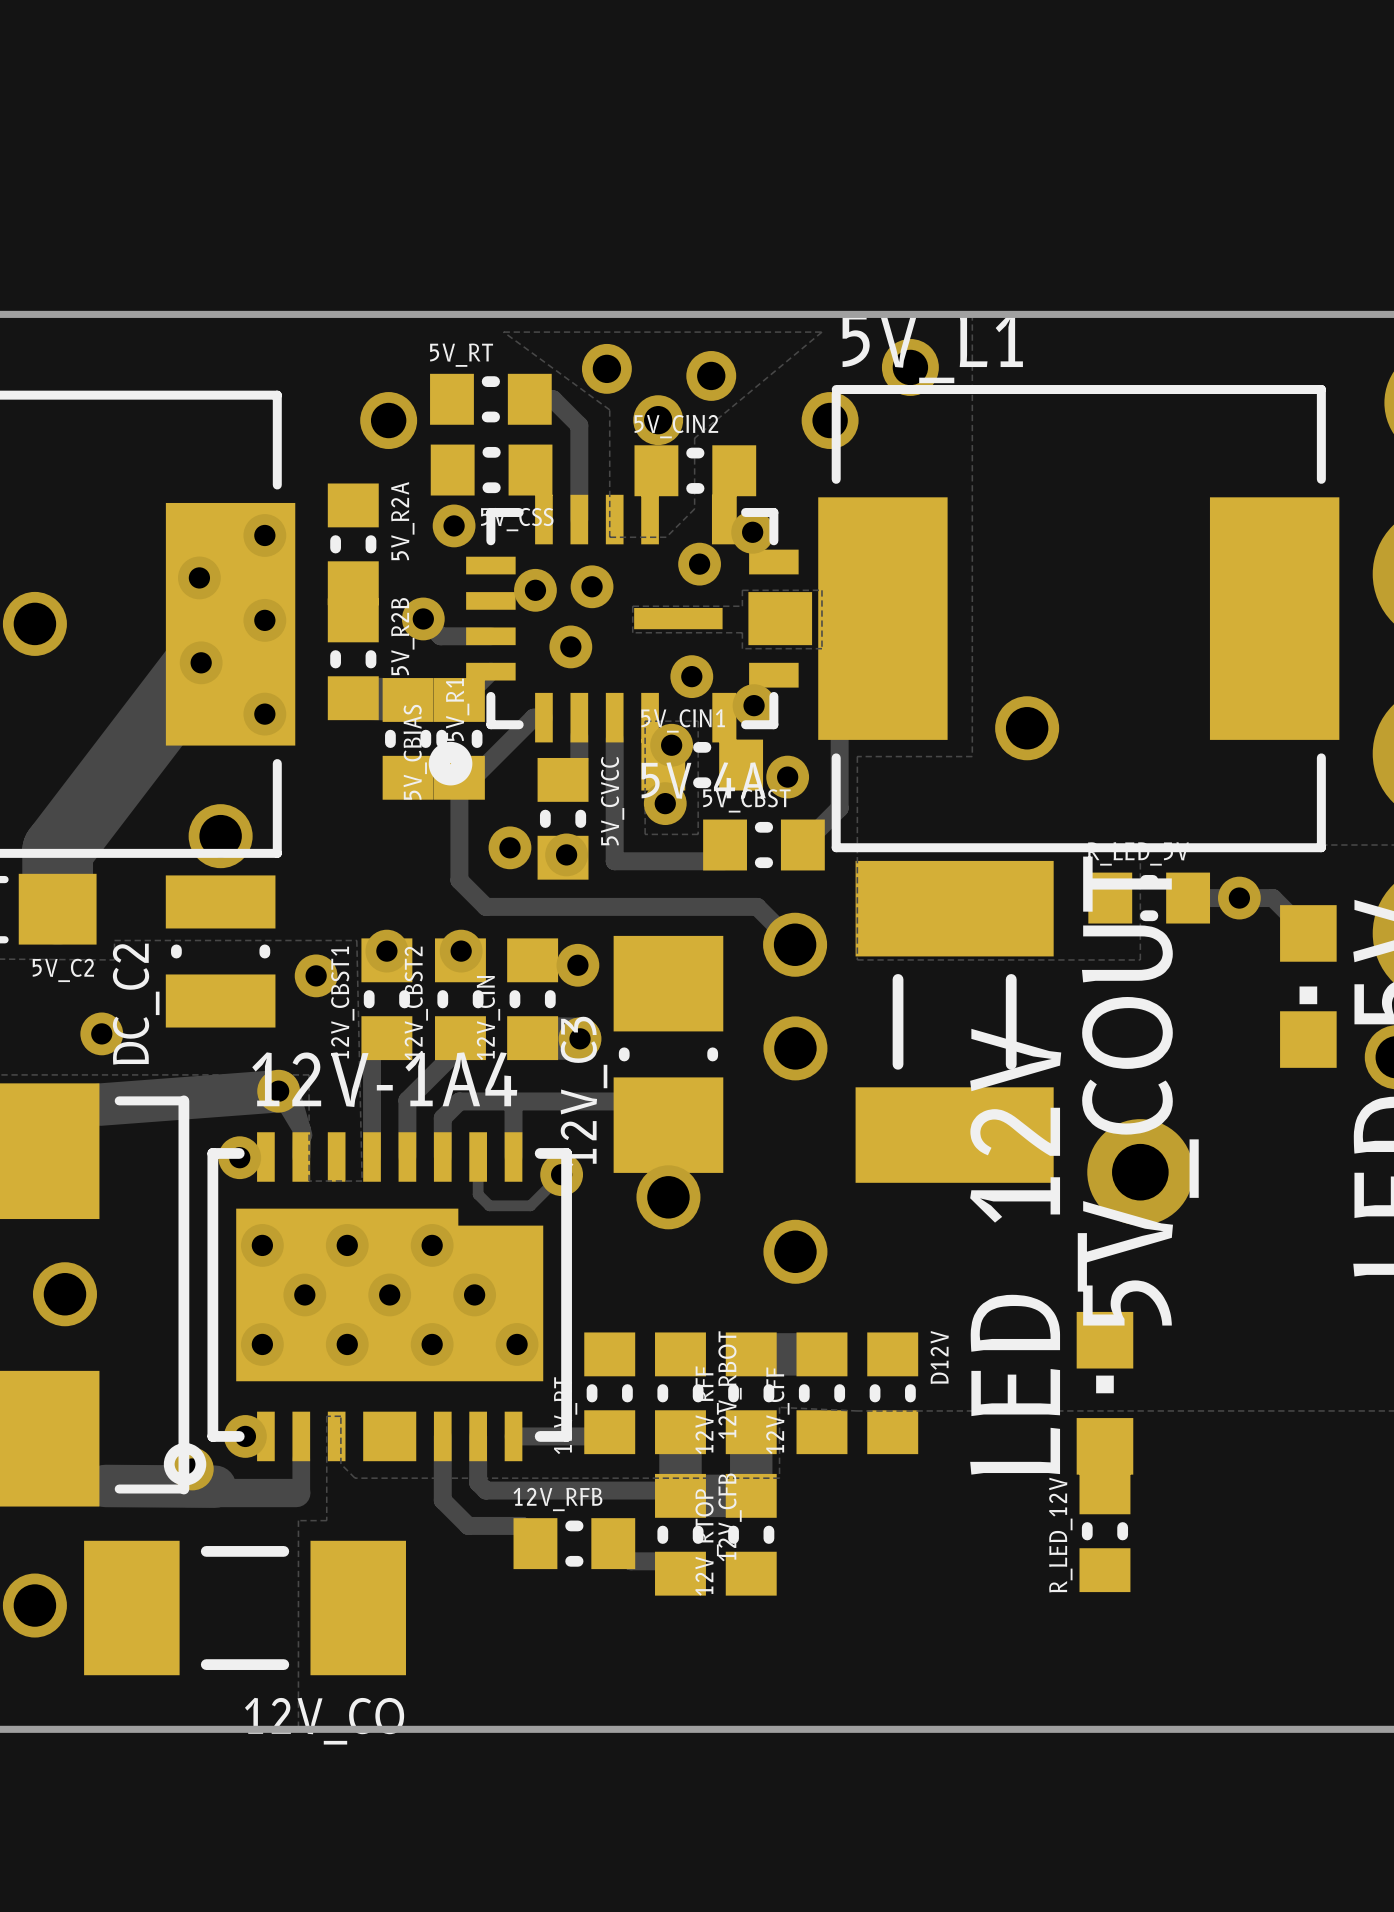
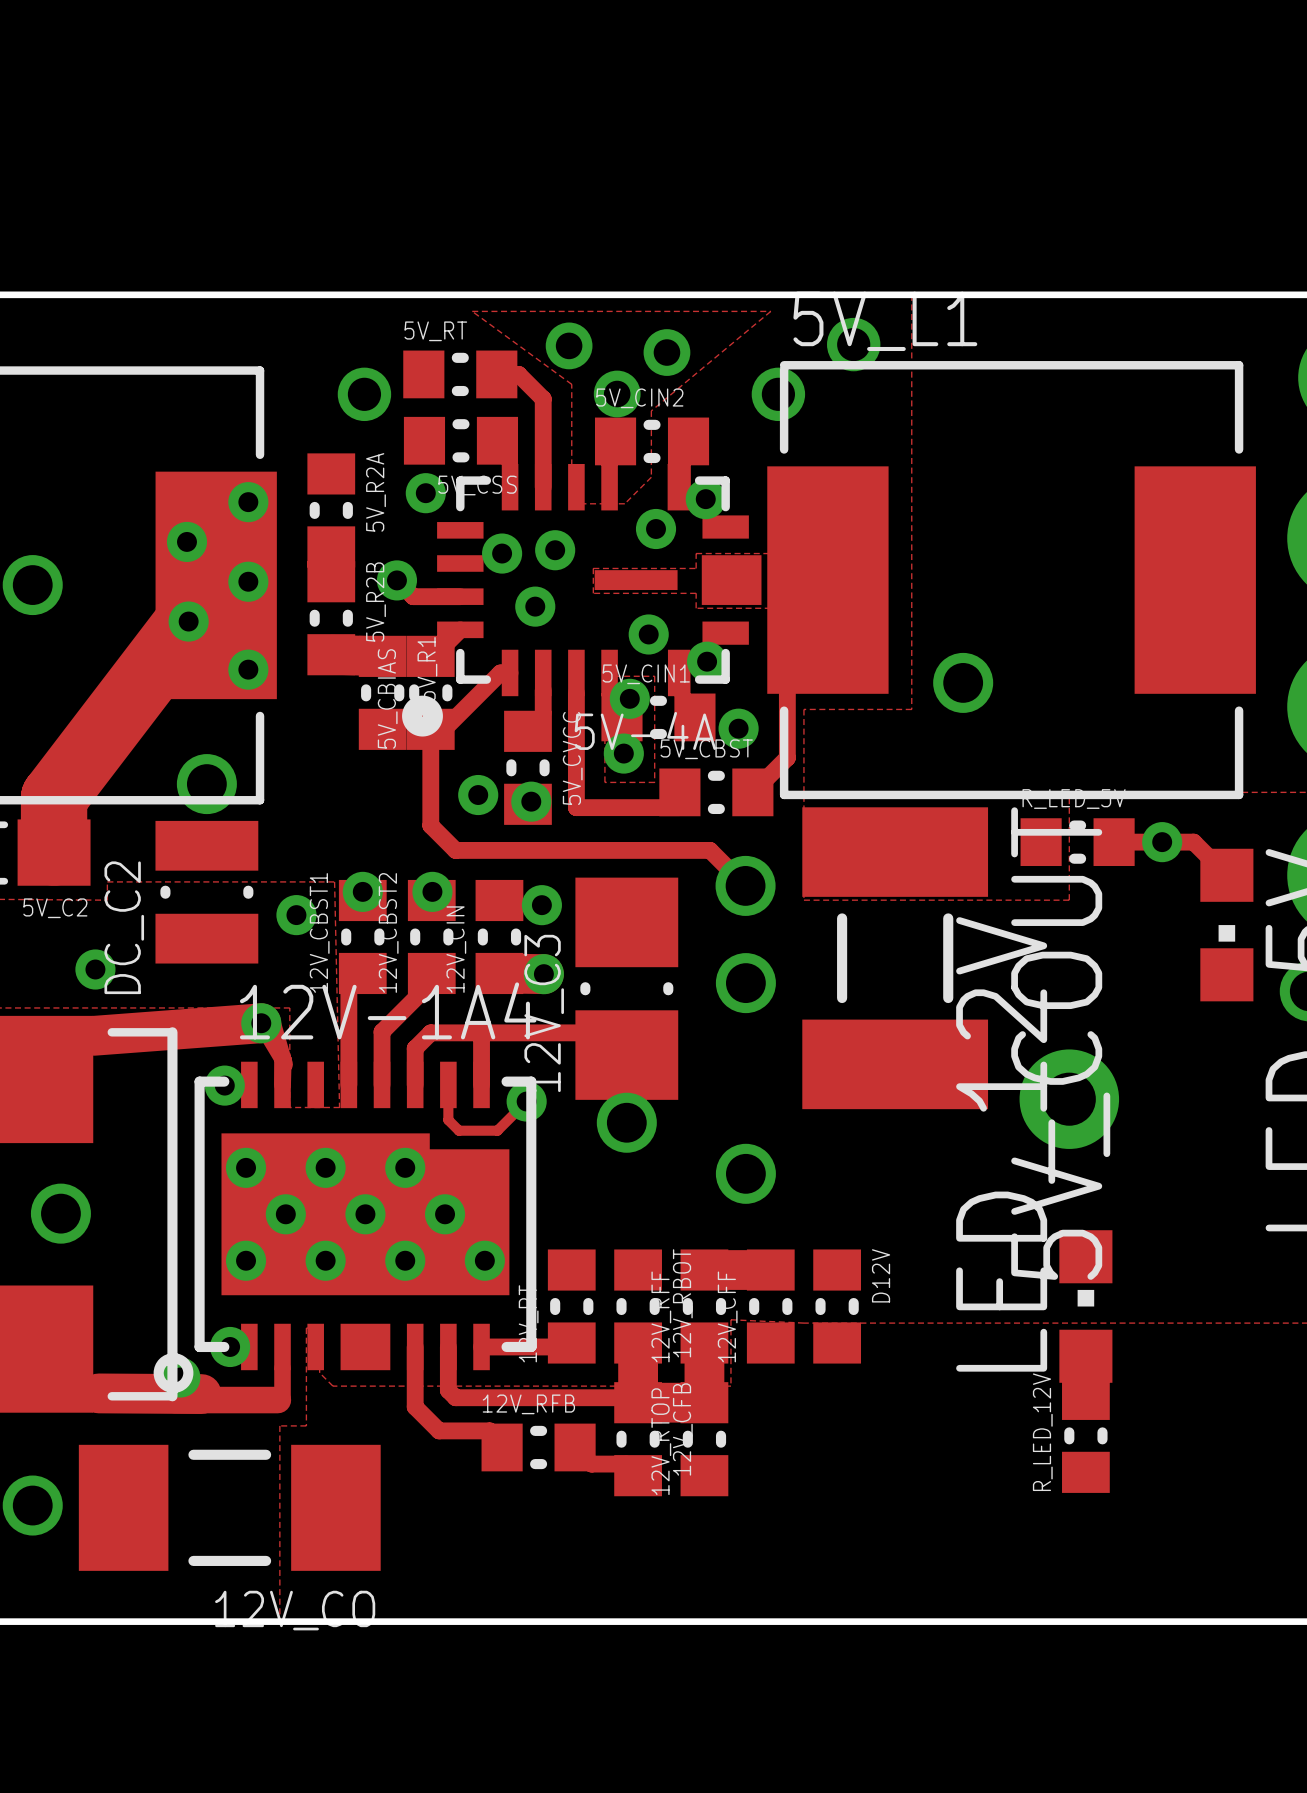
LED_12V position: (1104, 1393) -> (1085, 1306)
R_LED_12V position: (1104, 1531) -> (1085, 1435)

